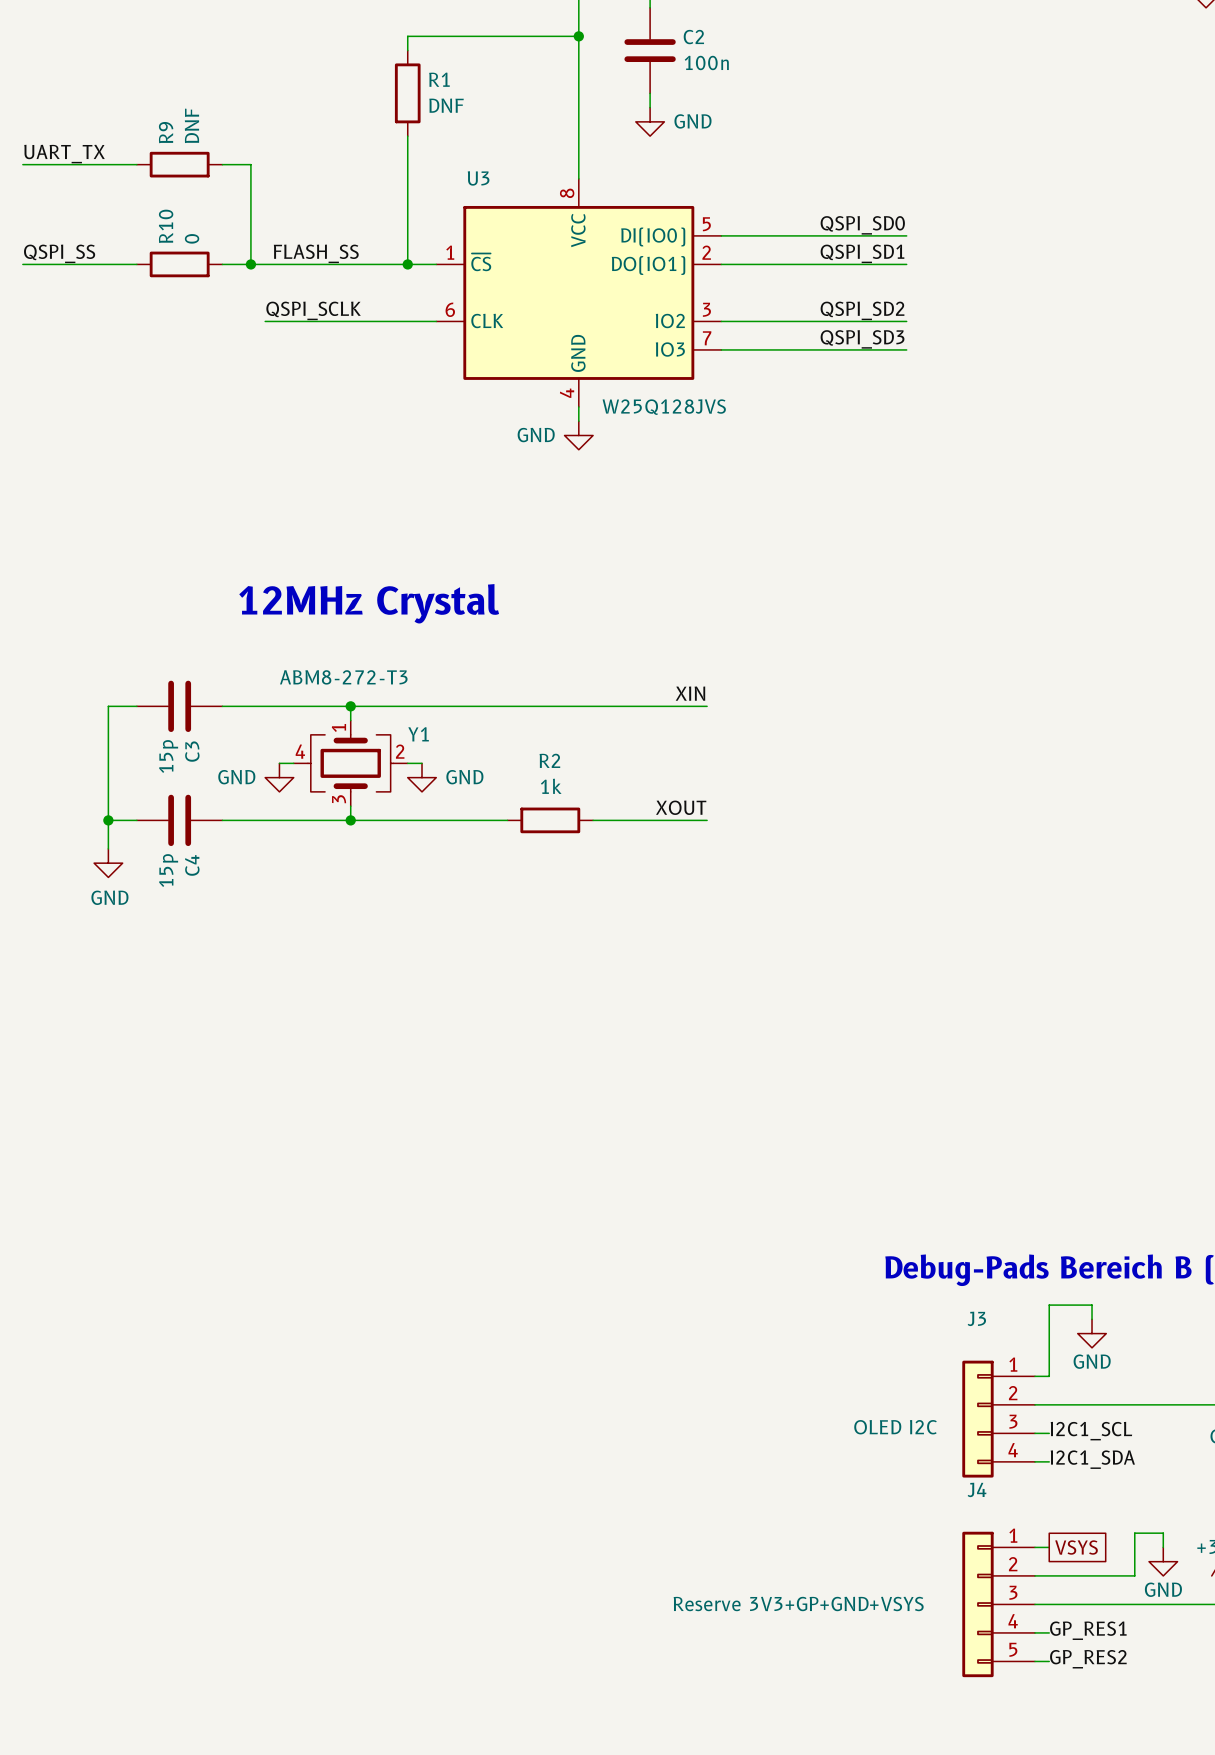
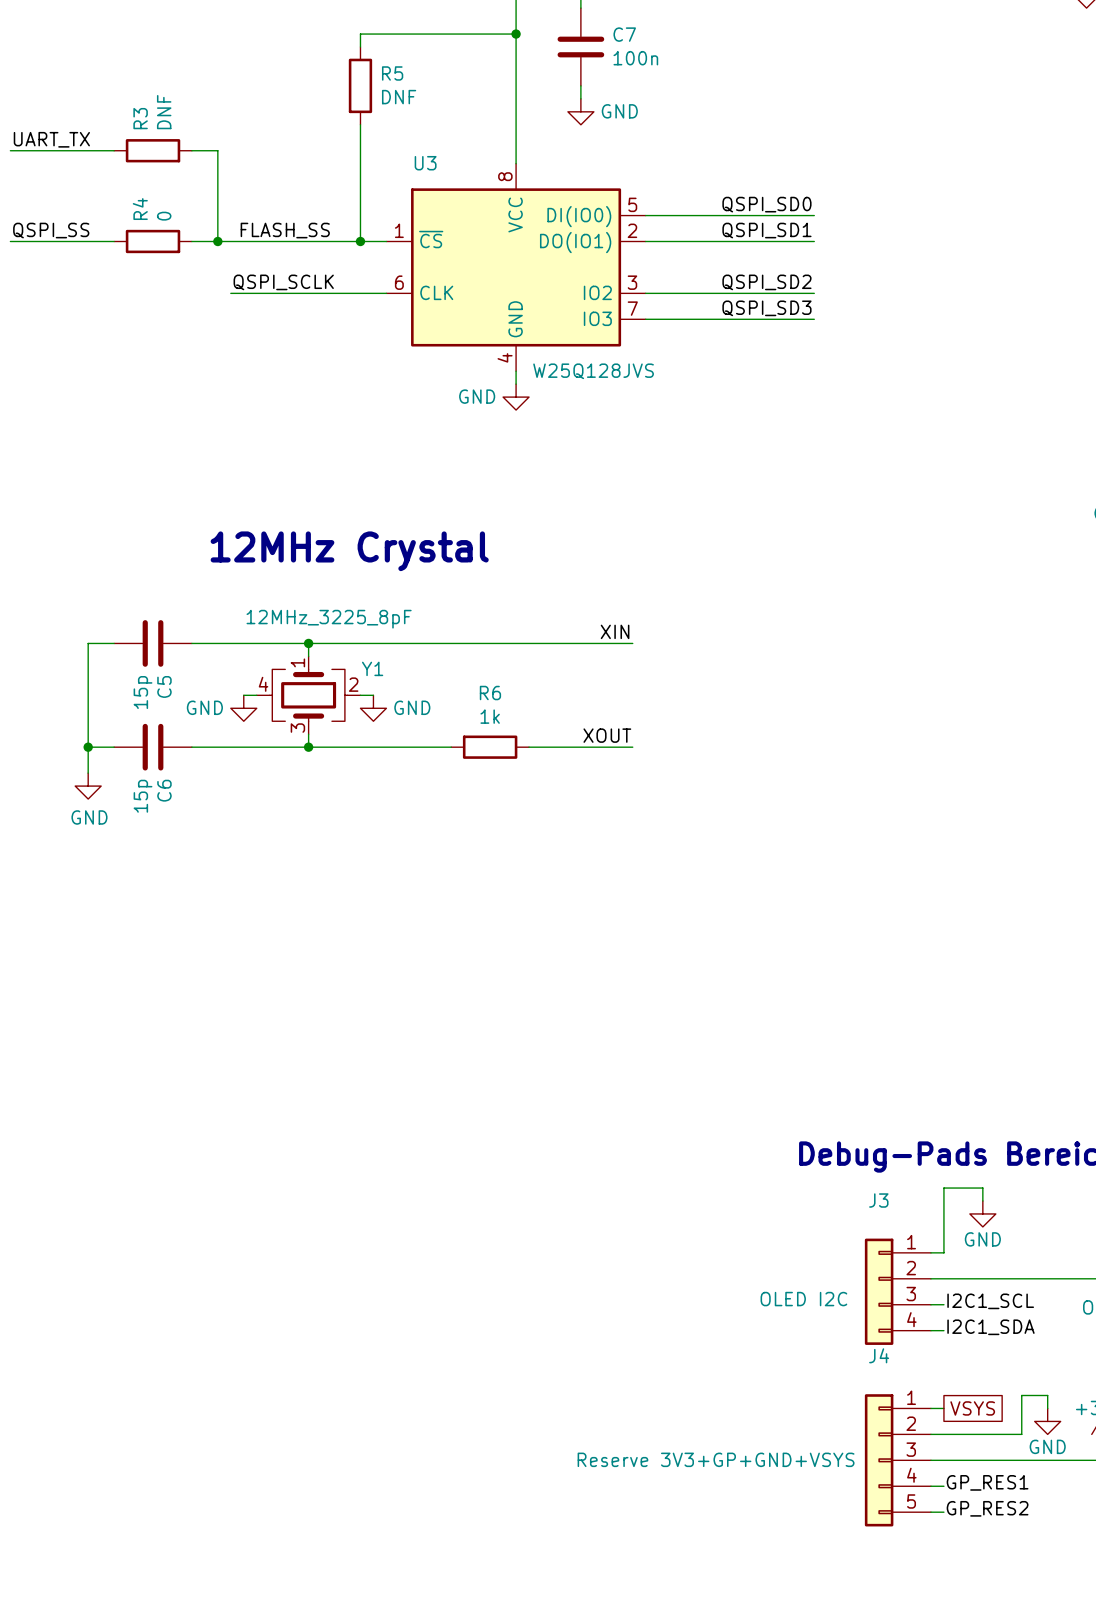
C2 name: C2 (693, 37) -> C7 (624, 34)
R1 name: R1 (439, 79) -> R5 (392, 73)
R9 name: R9 (166, 132) -> R3 (140, 118)
R10 name: R10 (166, 226) -> R4 (140, 209)
Y1 value: ABM8-272-T3 (343, 677) -> 12MHz_3225_8pF (329, 619)
C3 name: C3 (192, 751) -> C5 (164, 686)
R2 name: R2 (549, 760) -> R6 (490, 693)
C4 name: C4 (192, 865) -> C6 (164, 790)

